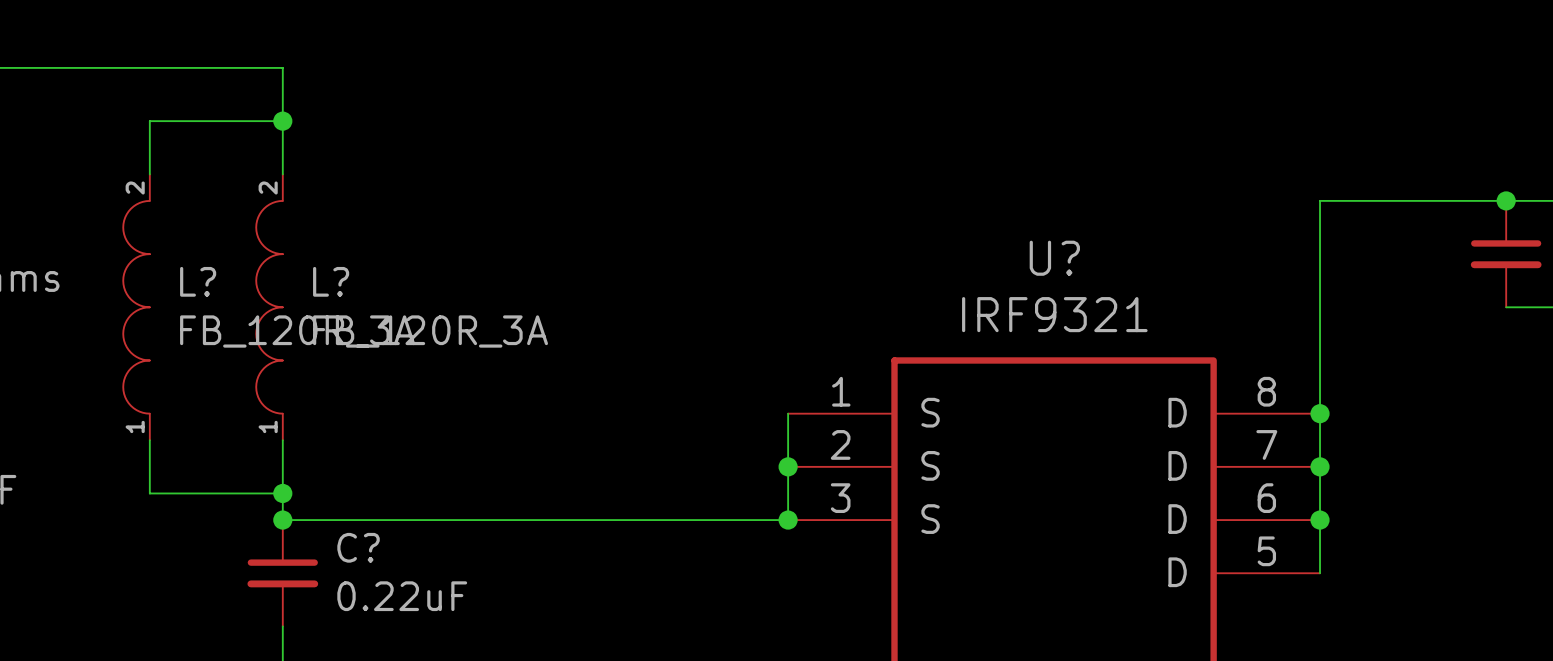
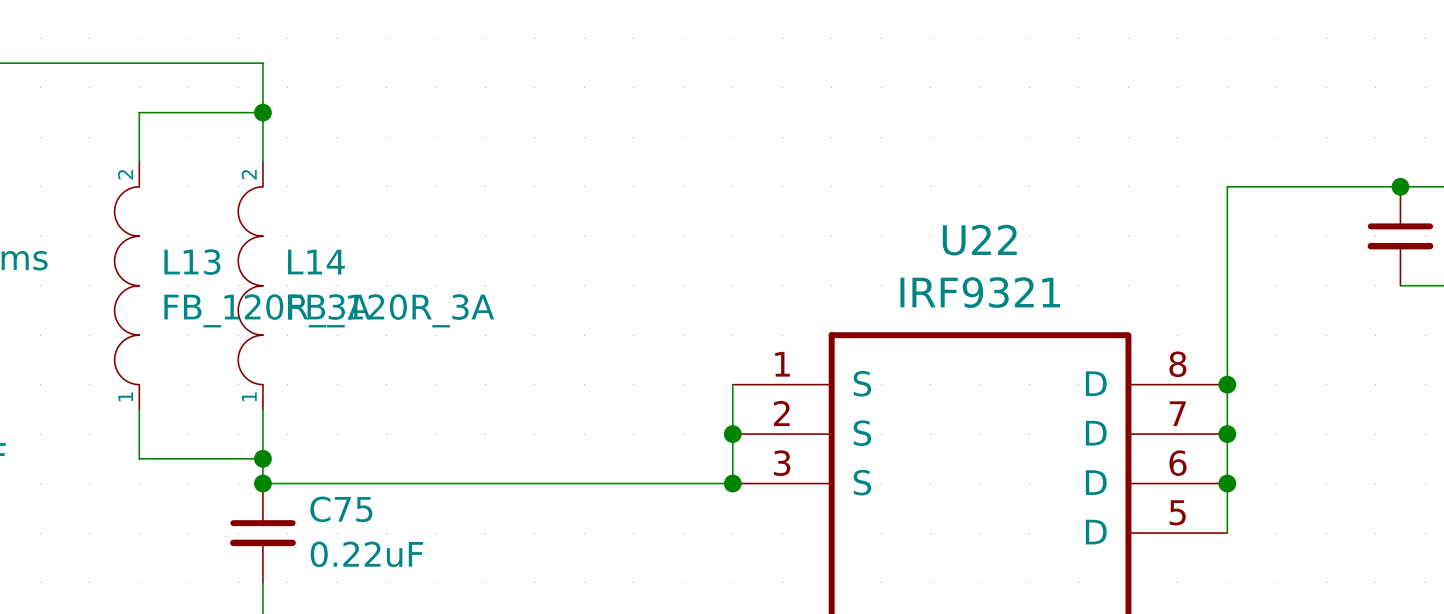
U? name: U? (1054, 258) -> U22 (979, 240)
L? name: L? (198, 281) -> L13 (192, 262)
L? name: L? (331, 281) -> L14 (316, 262)
C? name: C? (358, 547) -> C75 (341, 509)

